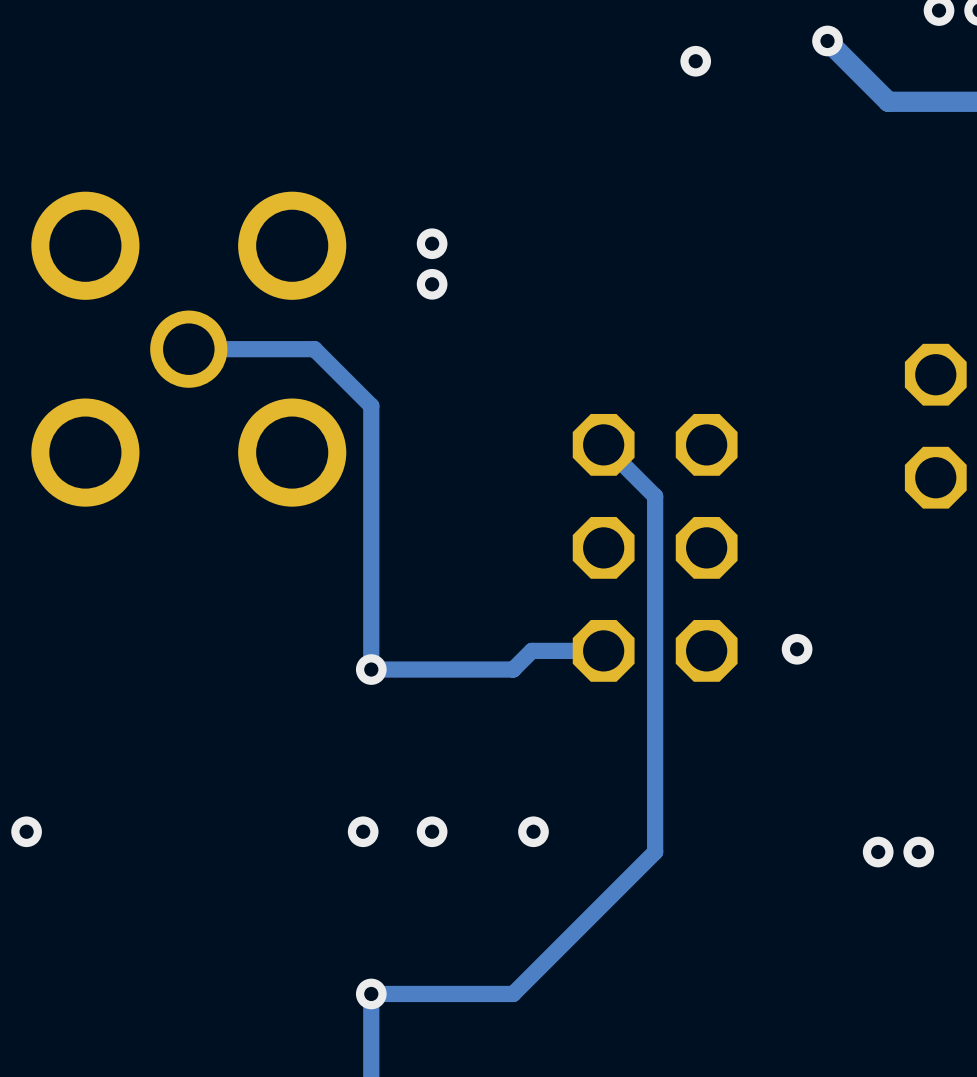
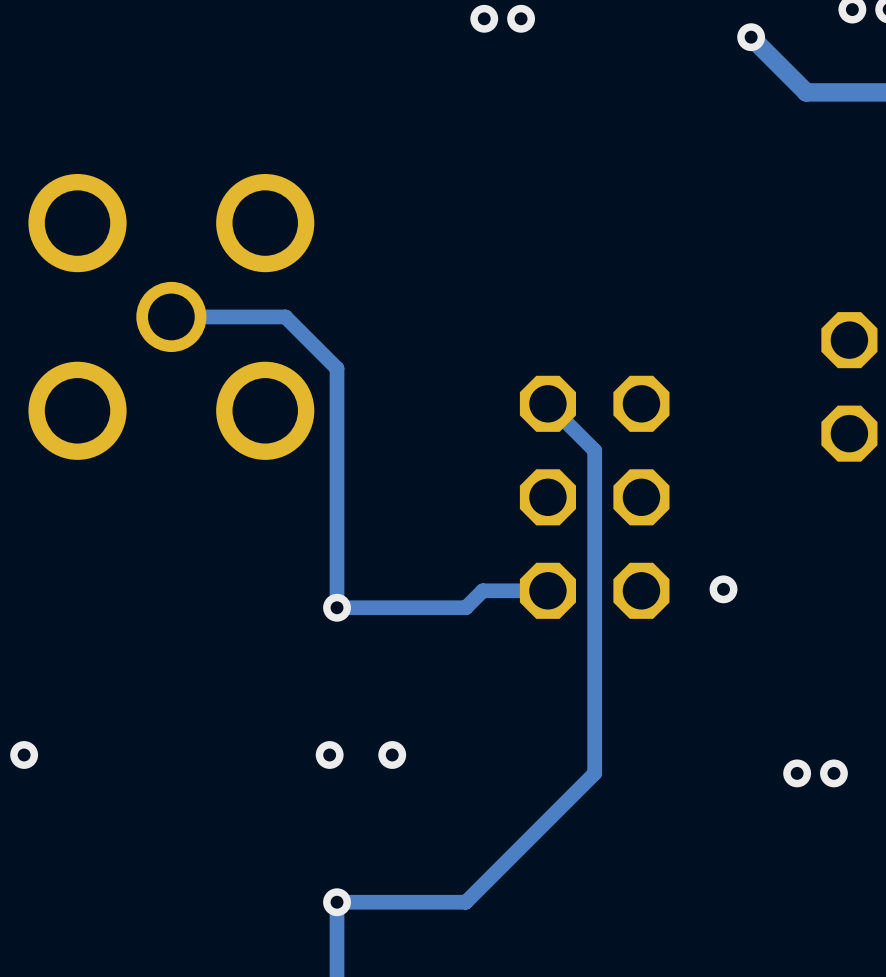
via: none -> (484, 18)
via: none -> (521, 18)
via: (695, 61) -> none
via: (432, 243) -> none
via: (432, 284) -> none
via: (533, 831) -> none

